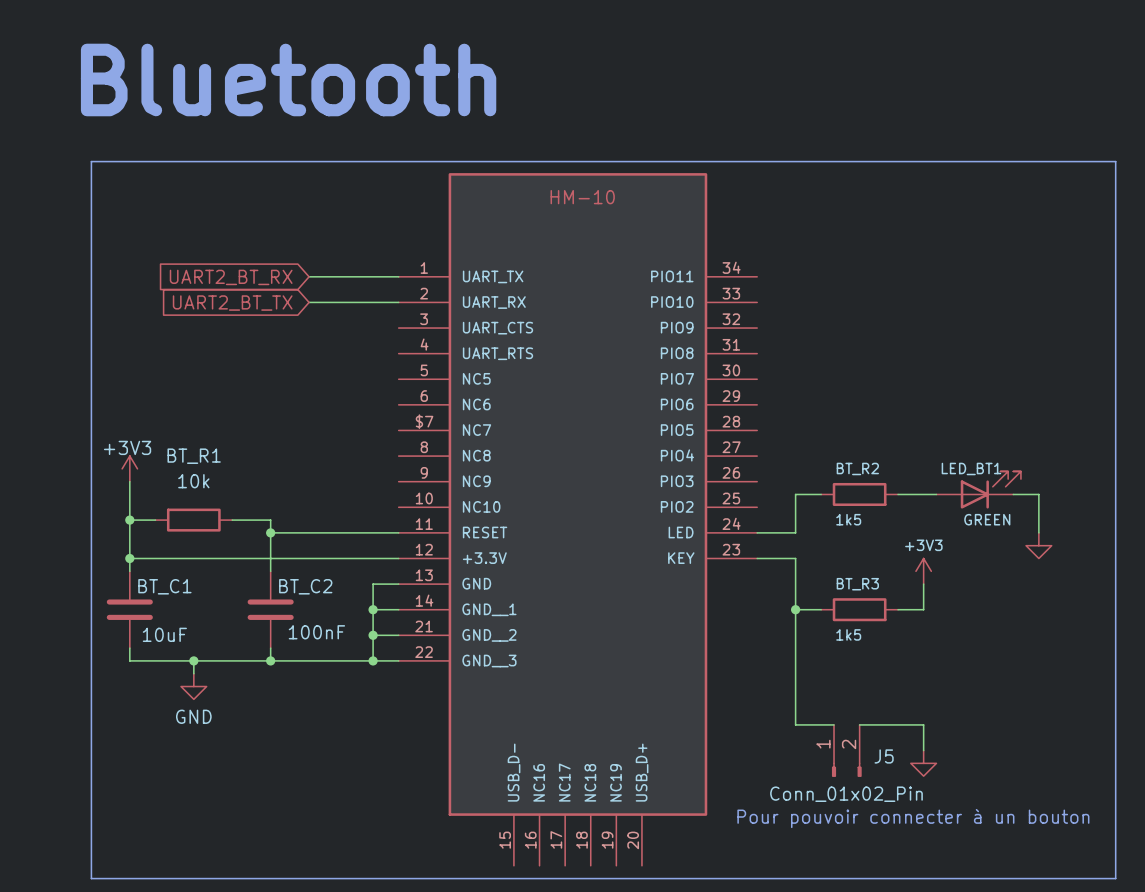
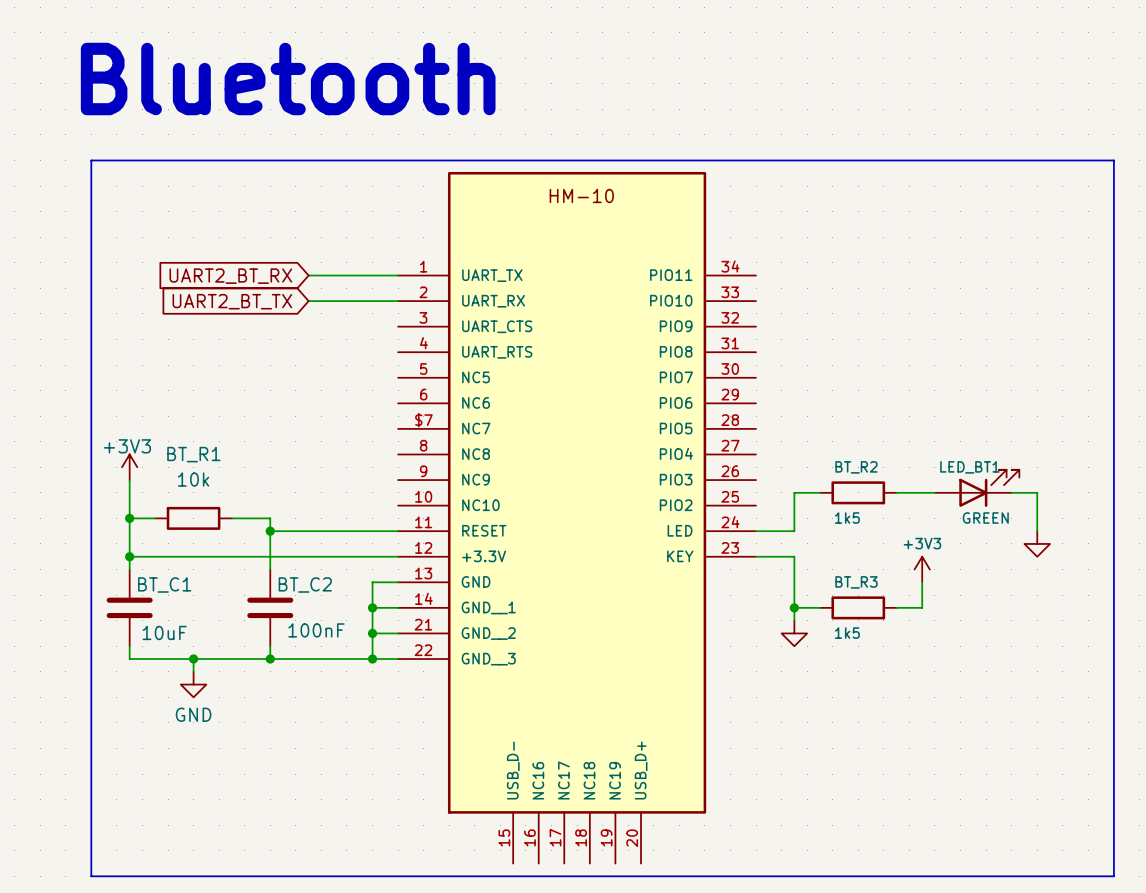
wire: (795, 622) (795, 724) (834, 724) -> none
wire: (859, 724) (923, 724) (923, 750) -> none
J5: Conn_01x02_Pin (846, 750) -> none
power symbol position: (923, 763) -> (794, 633)
text: Pour pouvoir connecter à un bouton (913, 818) -> none

